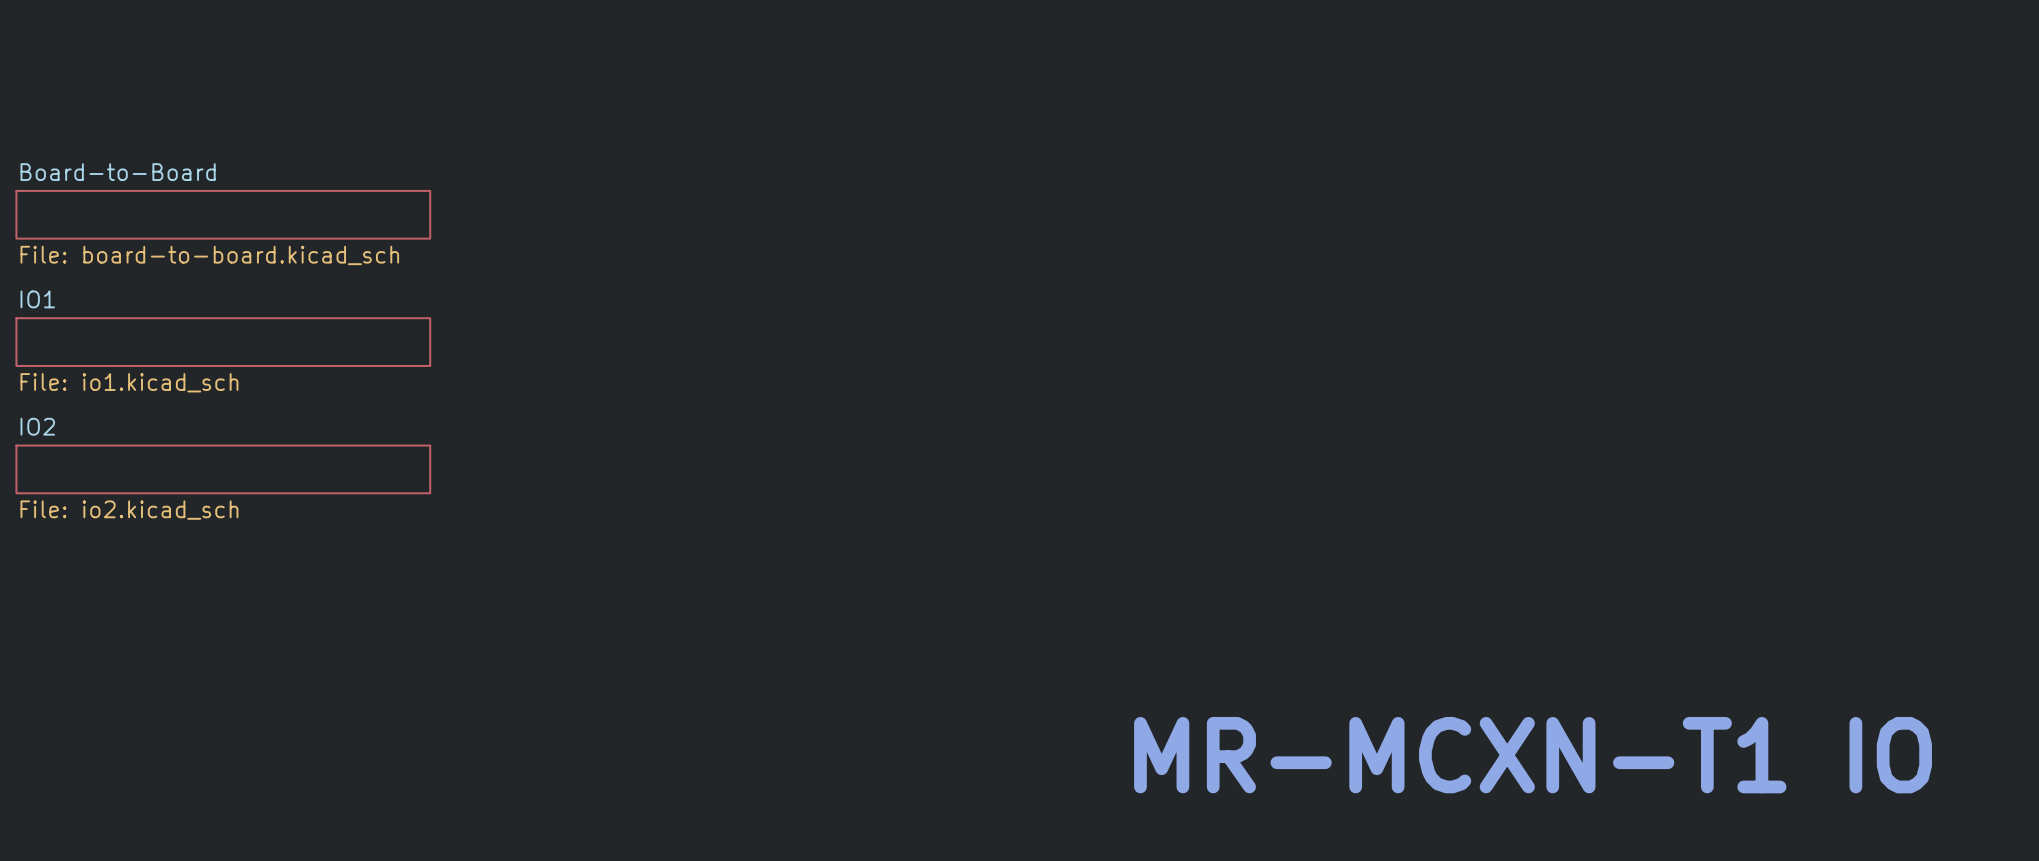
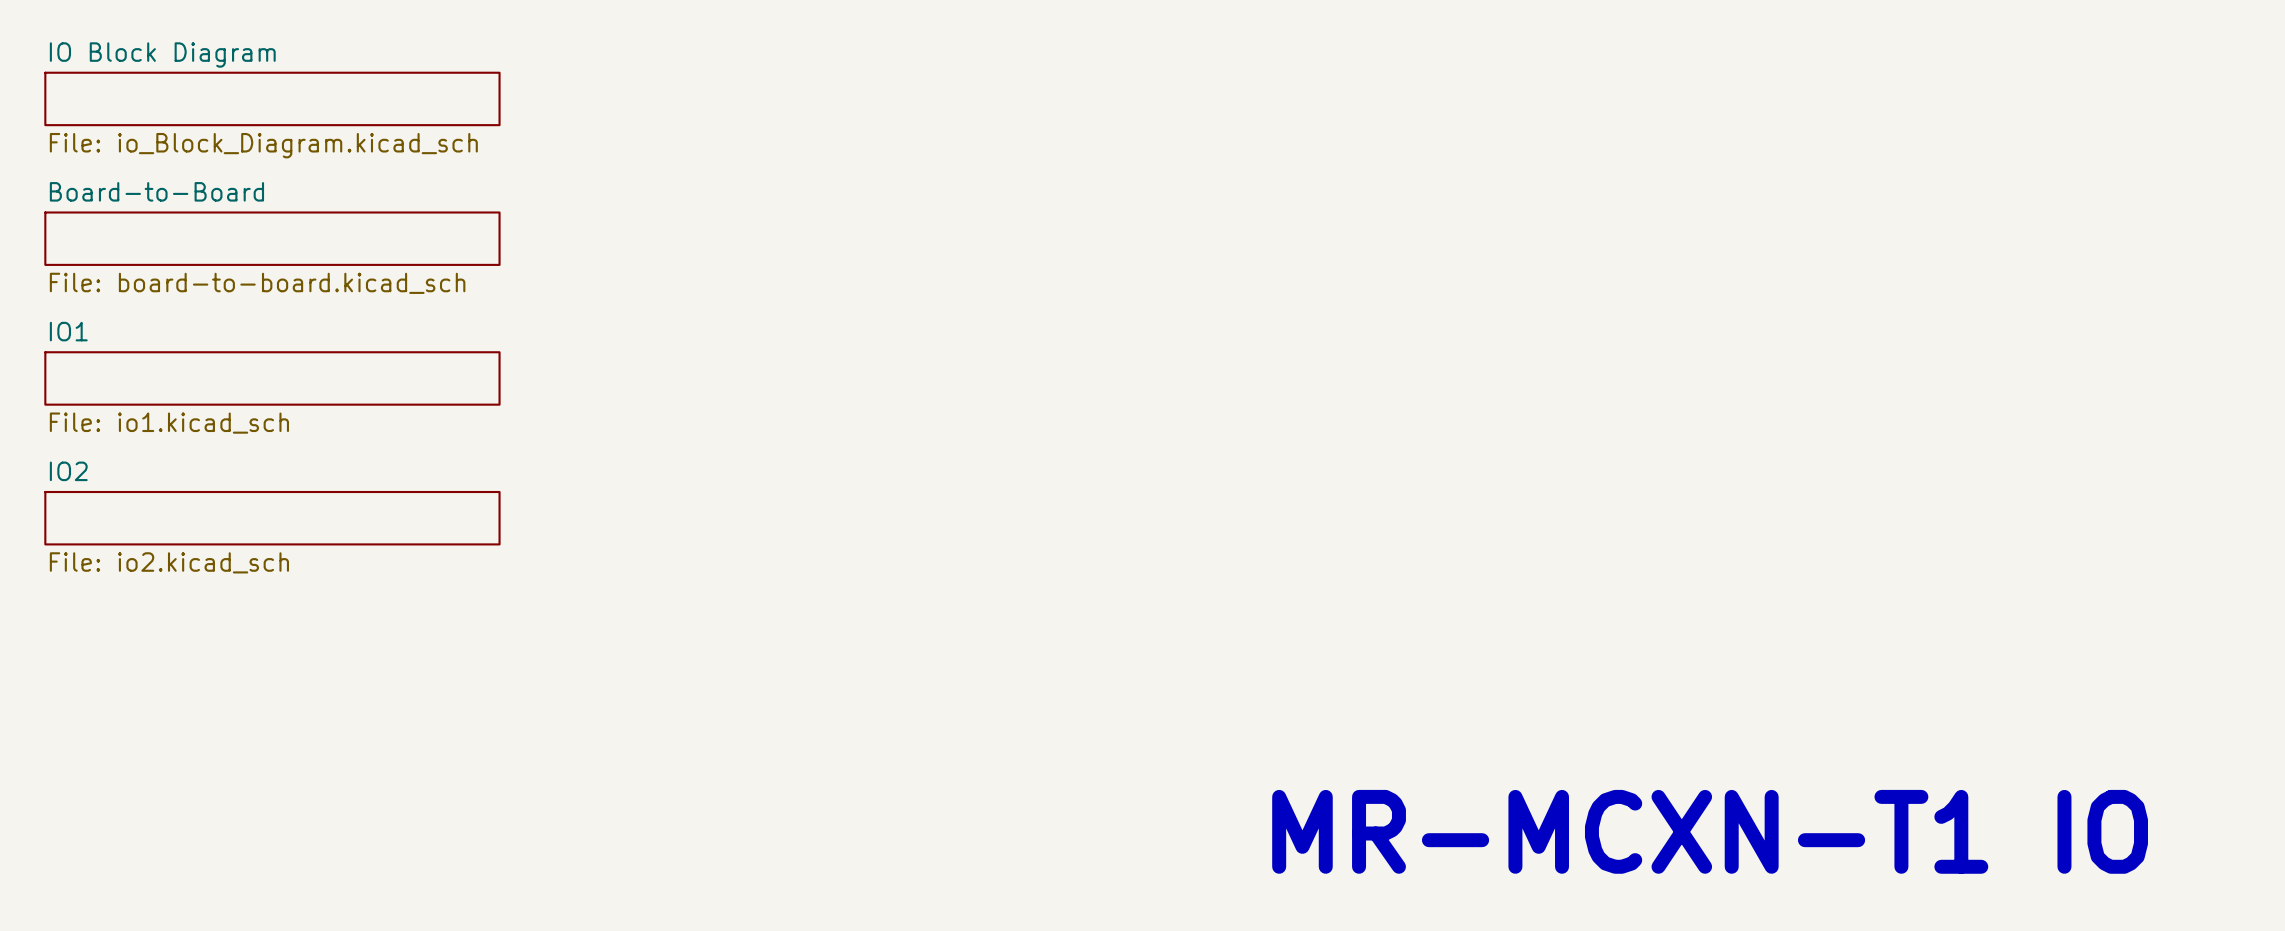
sheet IO Block Diagram: none -> File: io_Block_Diagram.kicad_sch (272, 98)

